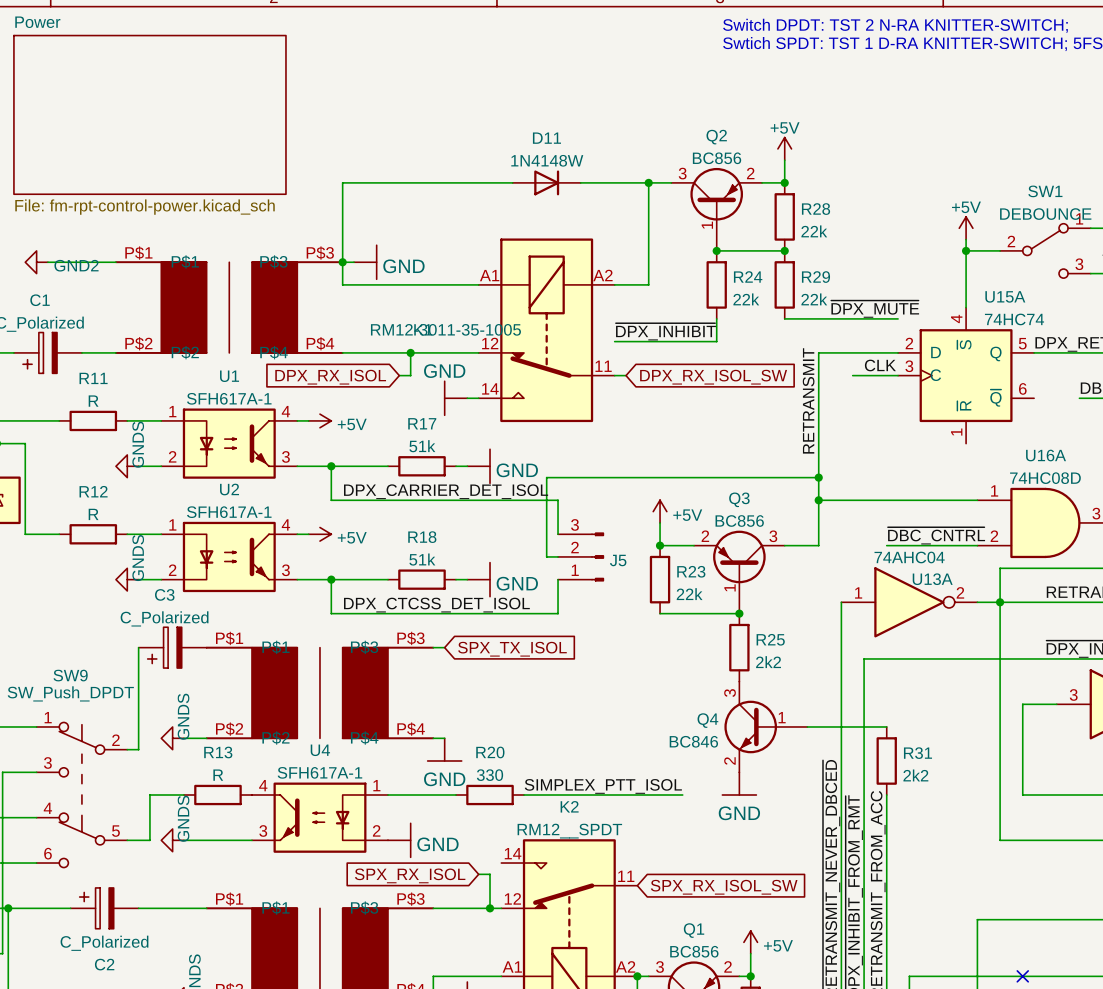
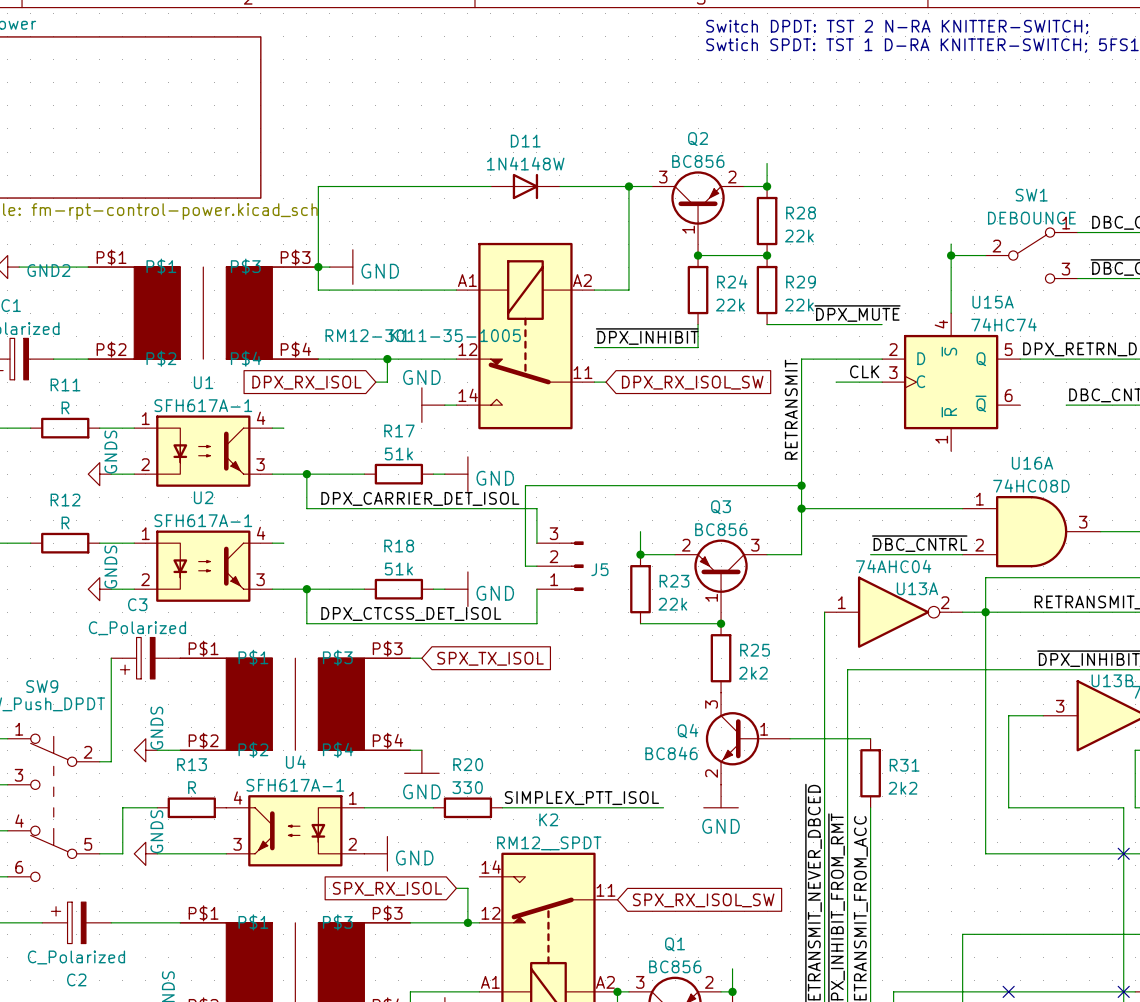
power symbol: +5V (784, 148) -> none
power symbol: +5V (966, 228) -> none
power symbol: +5V (319, 420) -> none
power symbol: +5V (660, 511) -> none
power symbol: +5V (319, 534) -> none
power symbol: +5V (750, 942) -> none

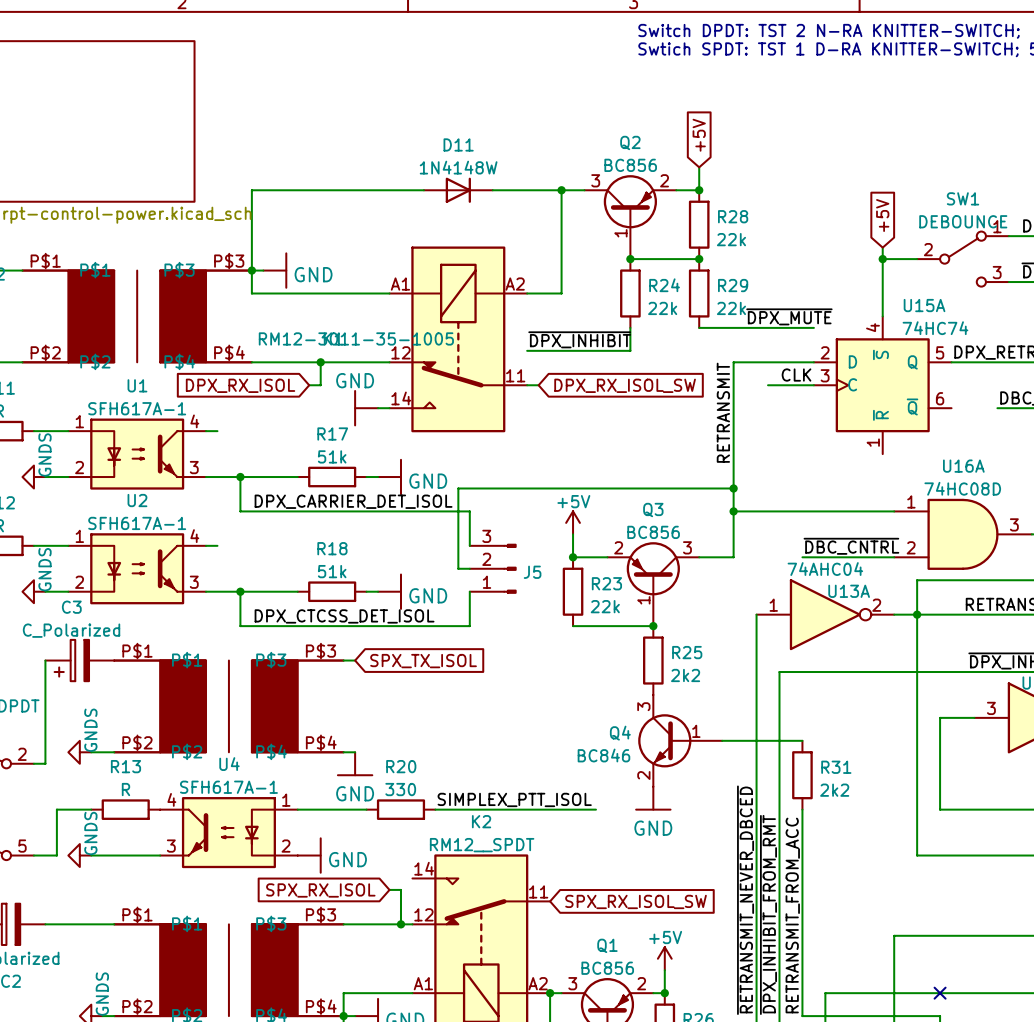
global label: none -> +5V (699, 135)
global label: none -> +5V (882, 215)
power symbol: none -> +5V (573, 522)
power symbol: none -> +5V (664, 958)

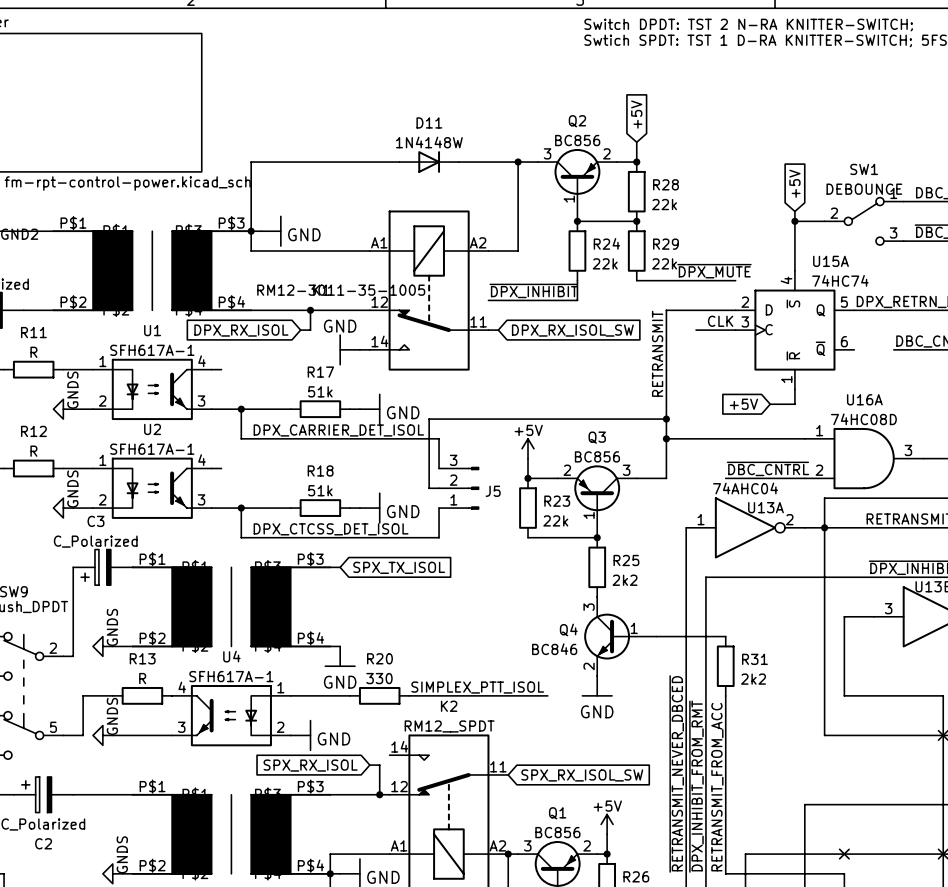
wire: none -> (794, 389) (794, 404) (770, 404)
global label: none -> +5V (743, 404)

